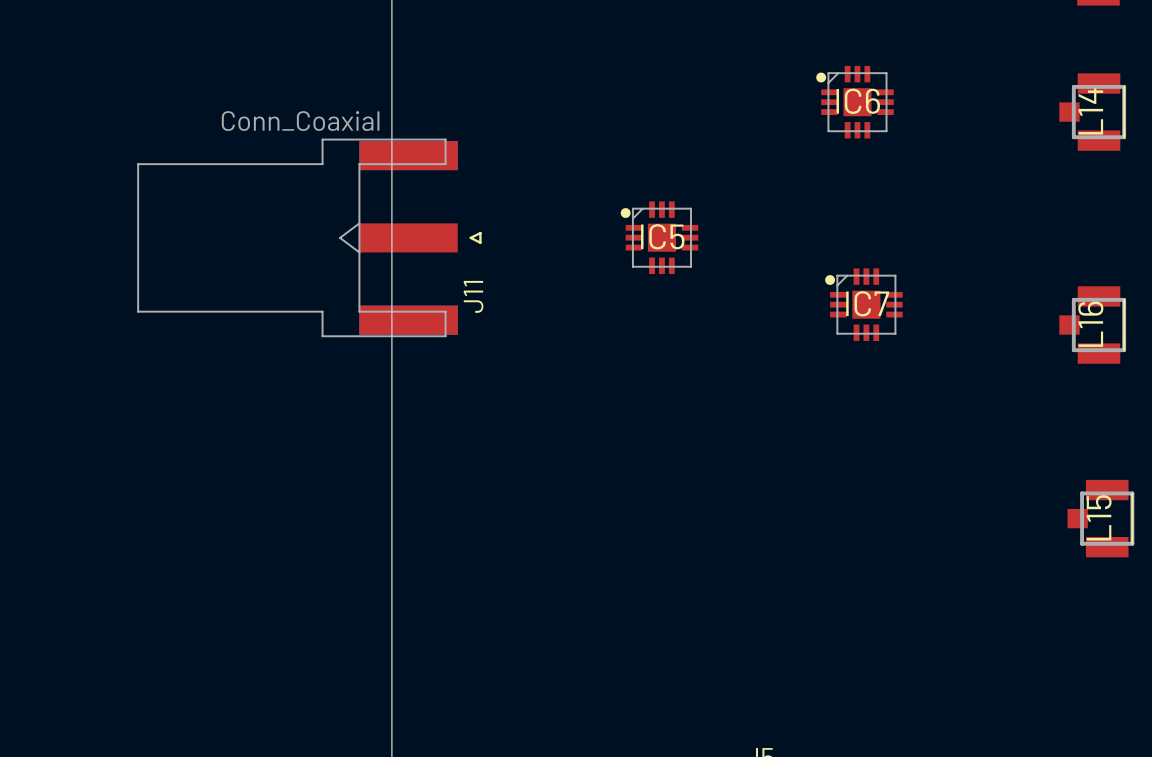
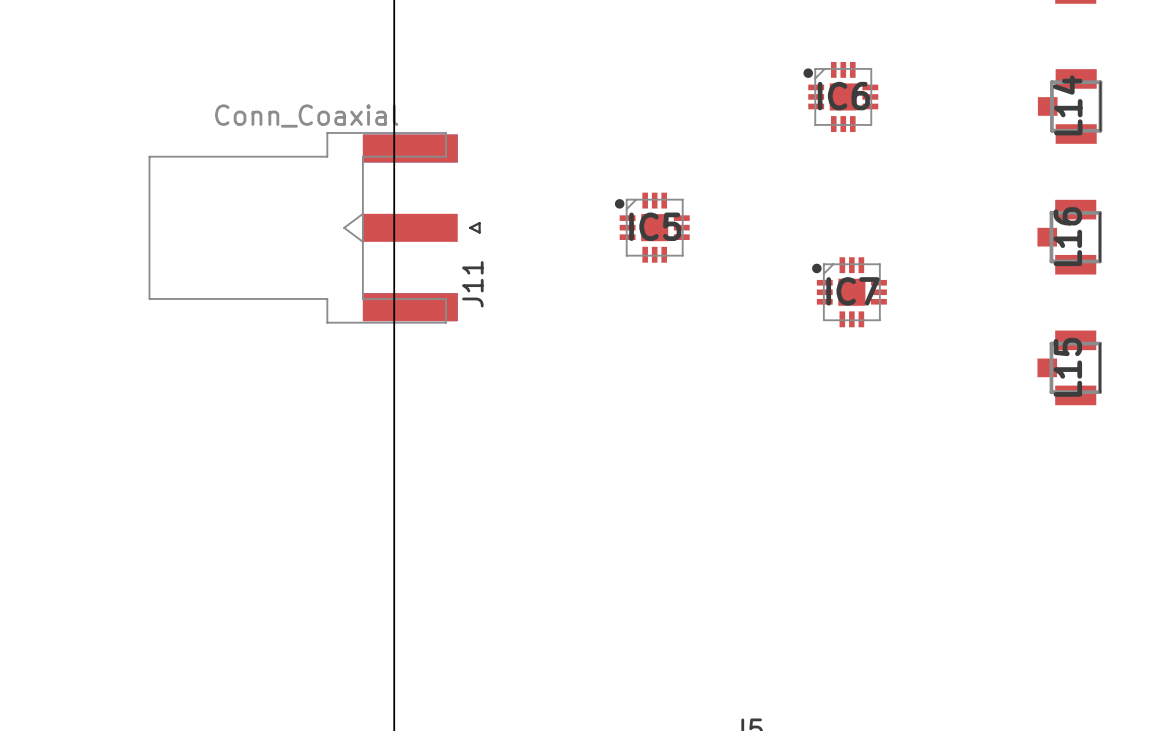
L16 position: (1092, 325) -> (1069, 237)
L15 position: (1100, 518) -> (1069, 367)

